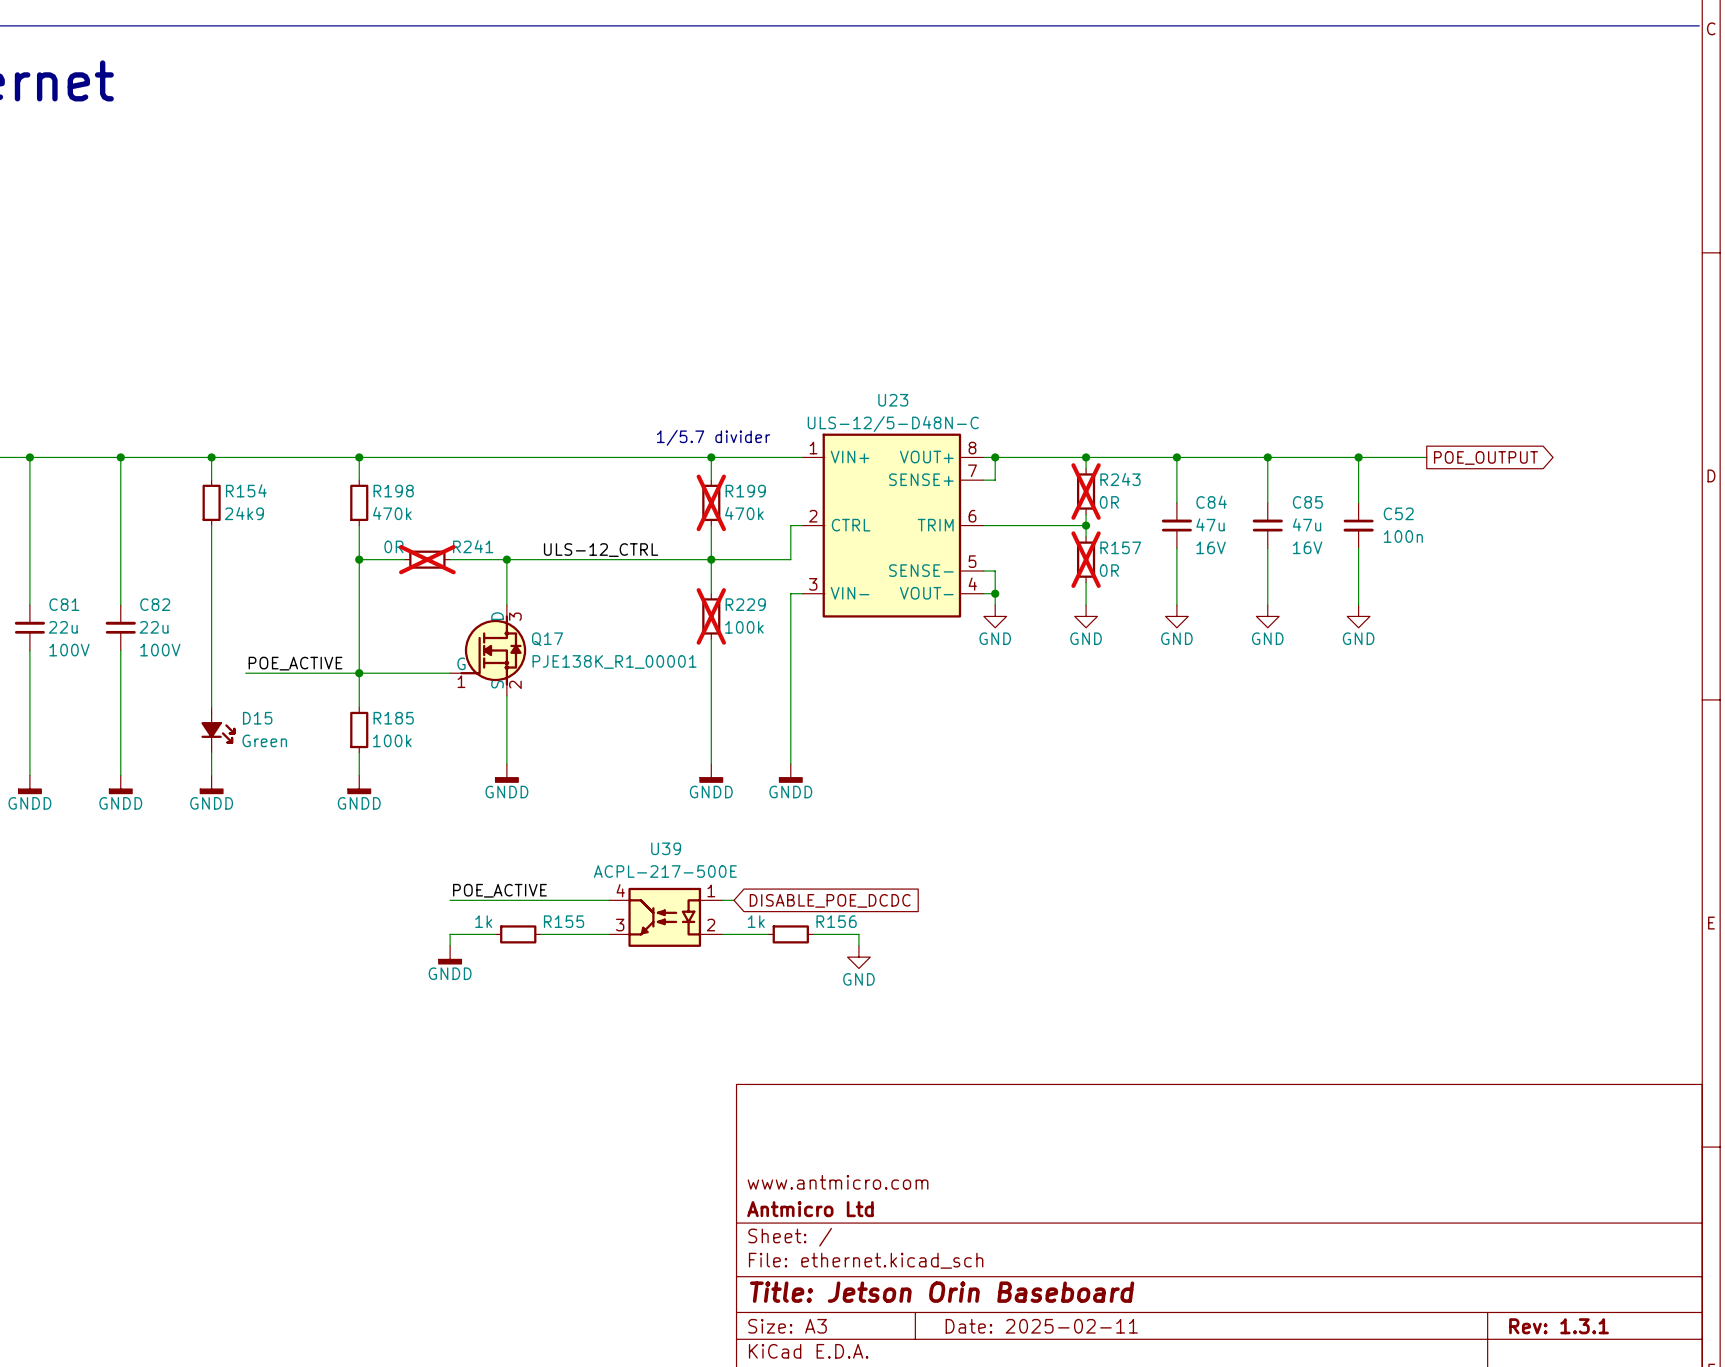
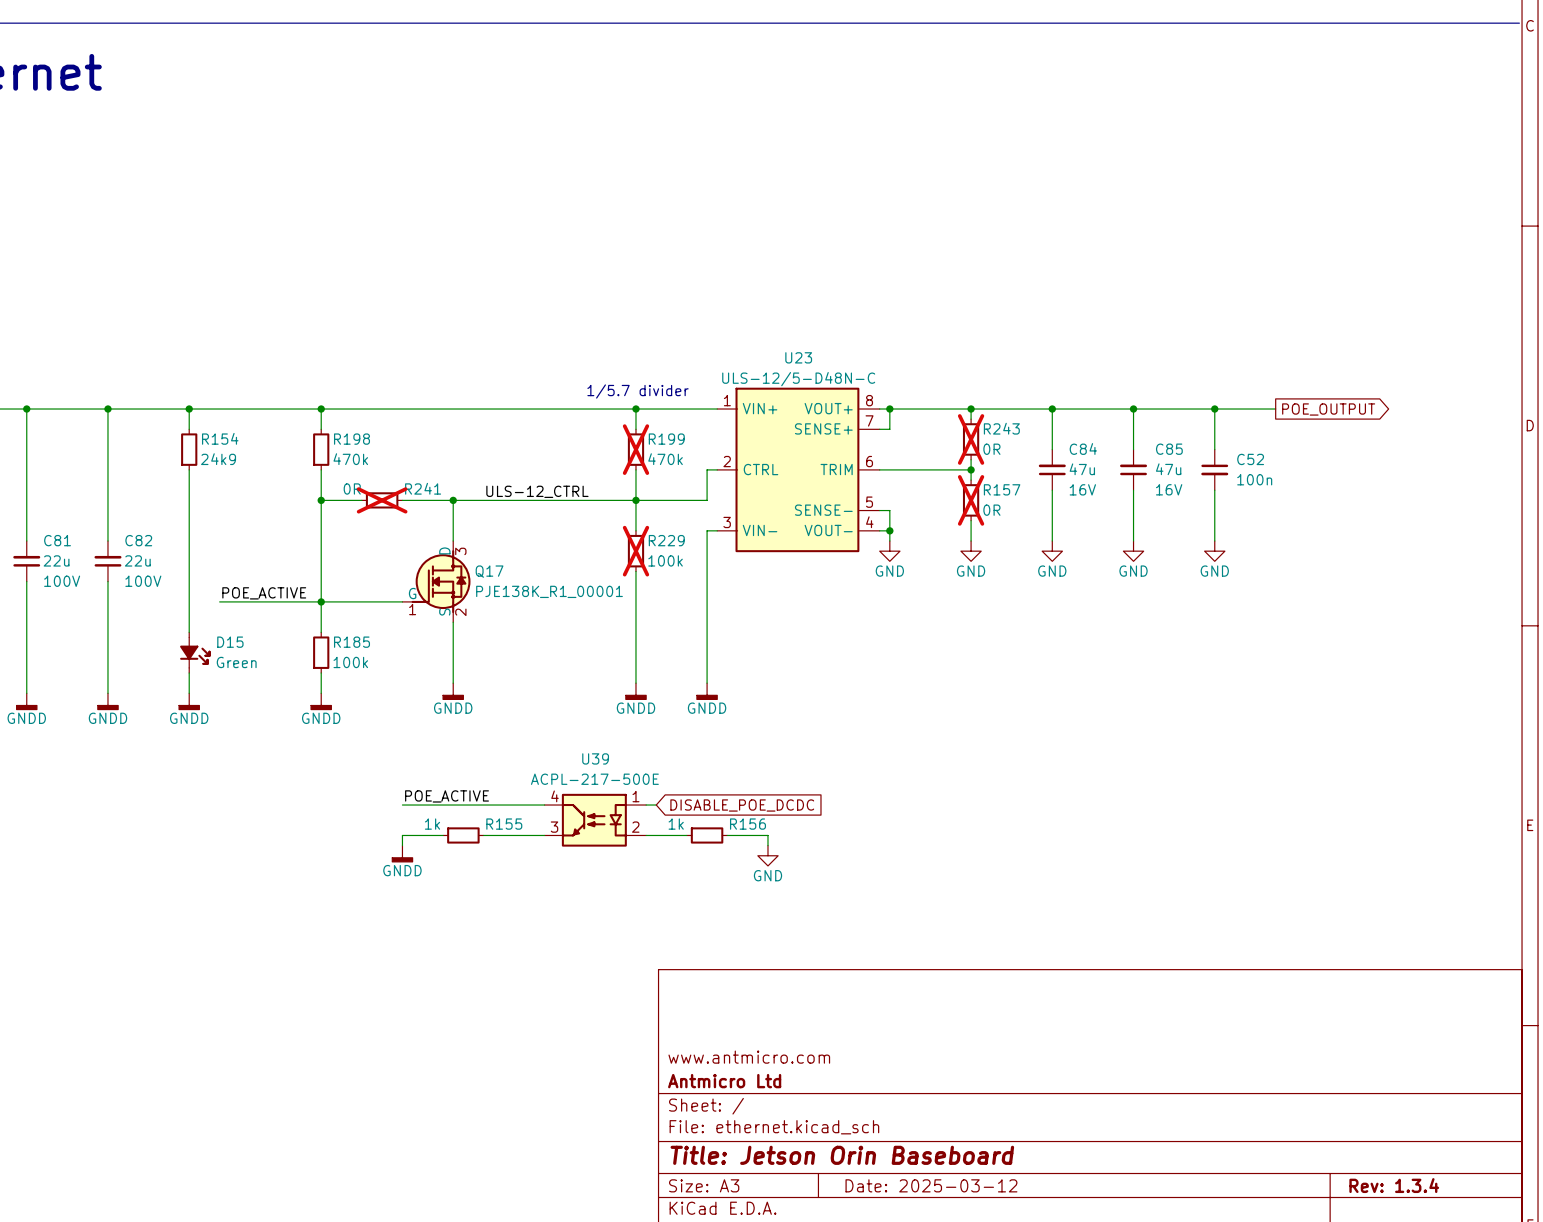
title block: Date: 2025-02-11 (1041, 1326) -> Date: 2025-03-12 (931, 1185)
title block: Rev: 1.3.1 (1559, 1326) -> Rev: 1.3.4 (1394, 1185)

